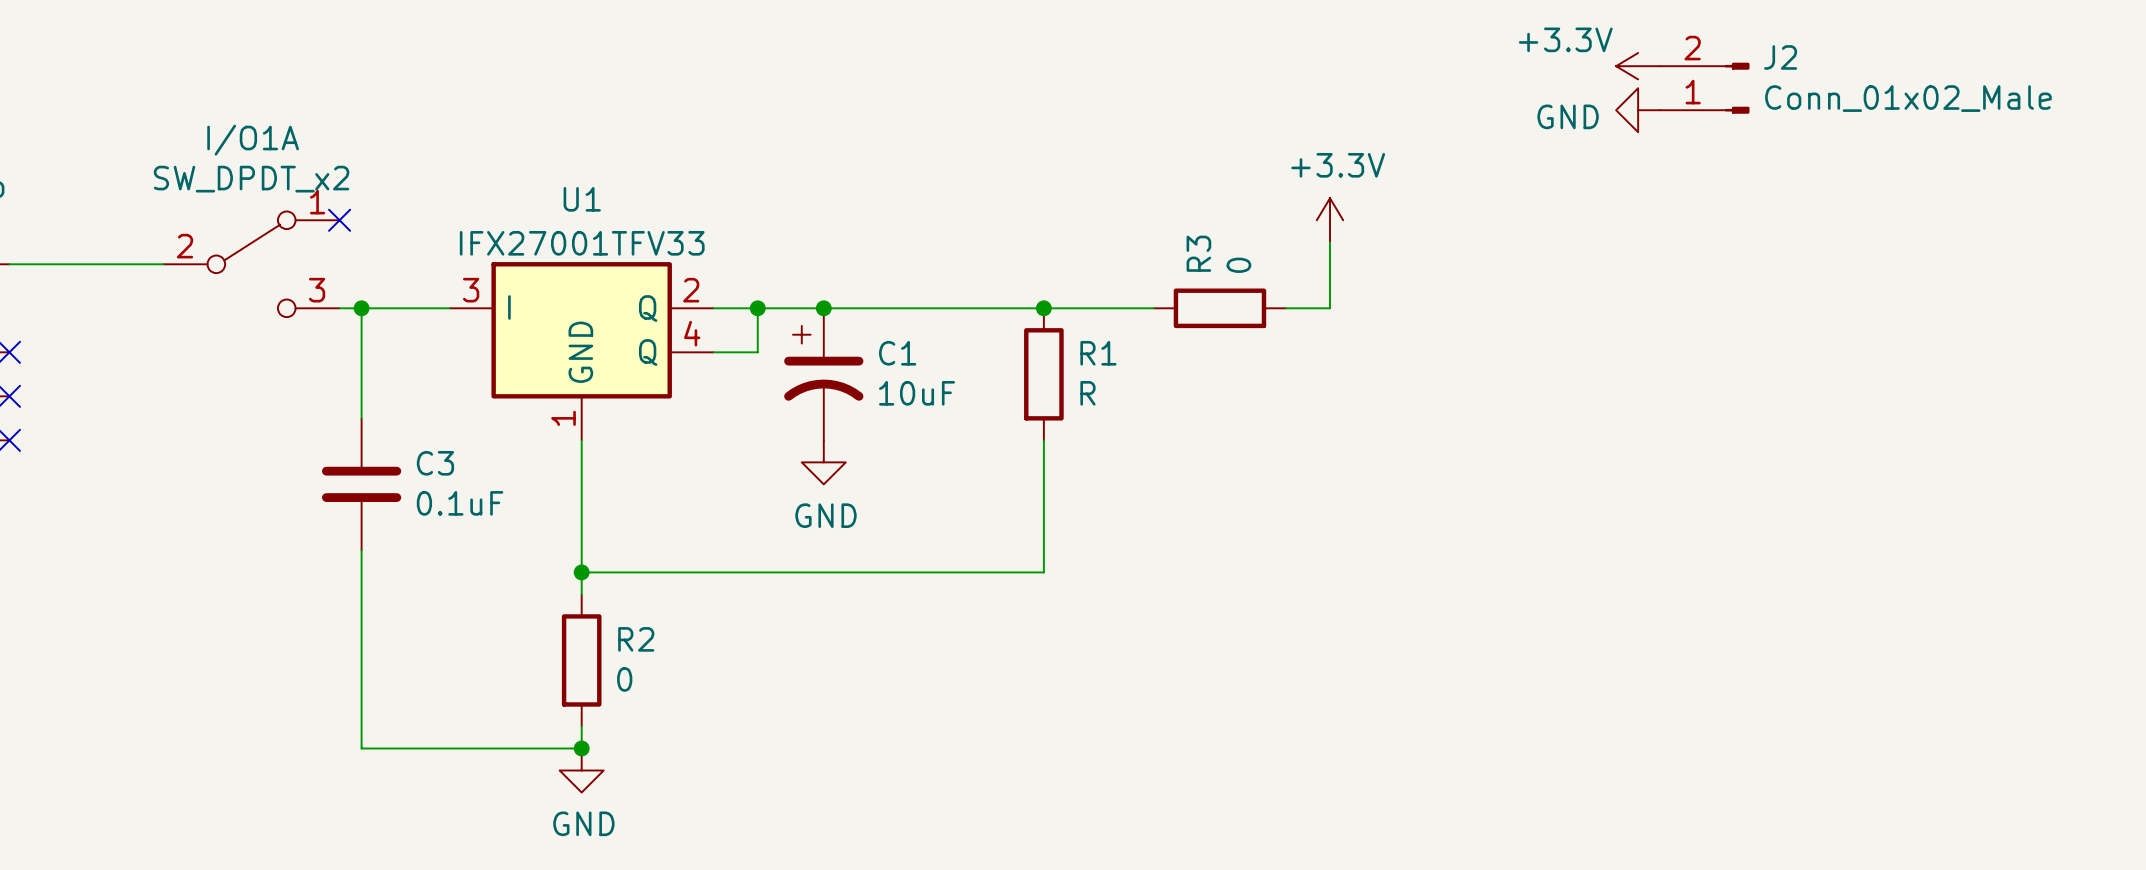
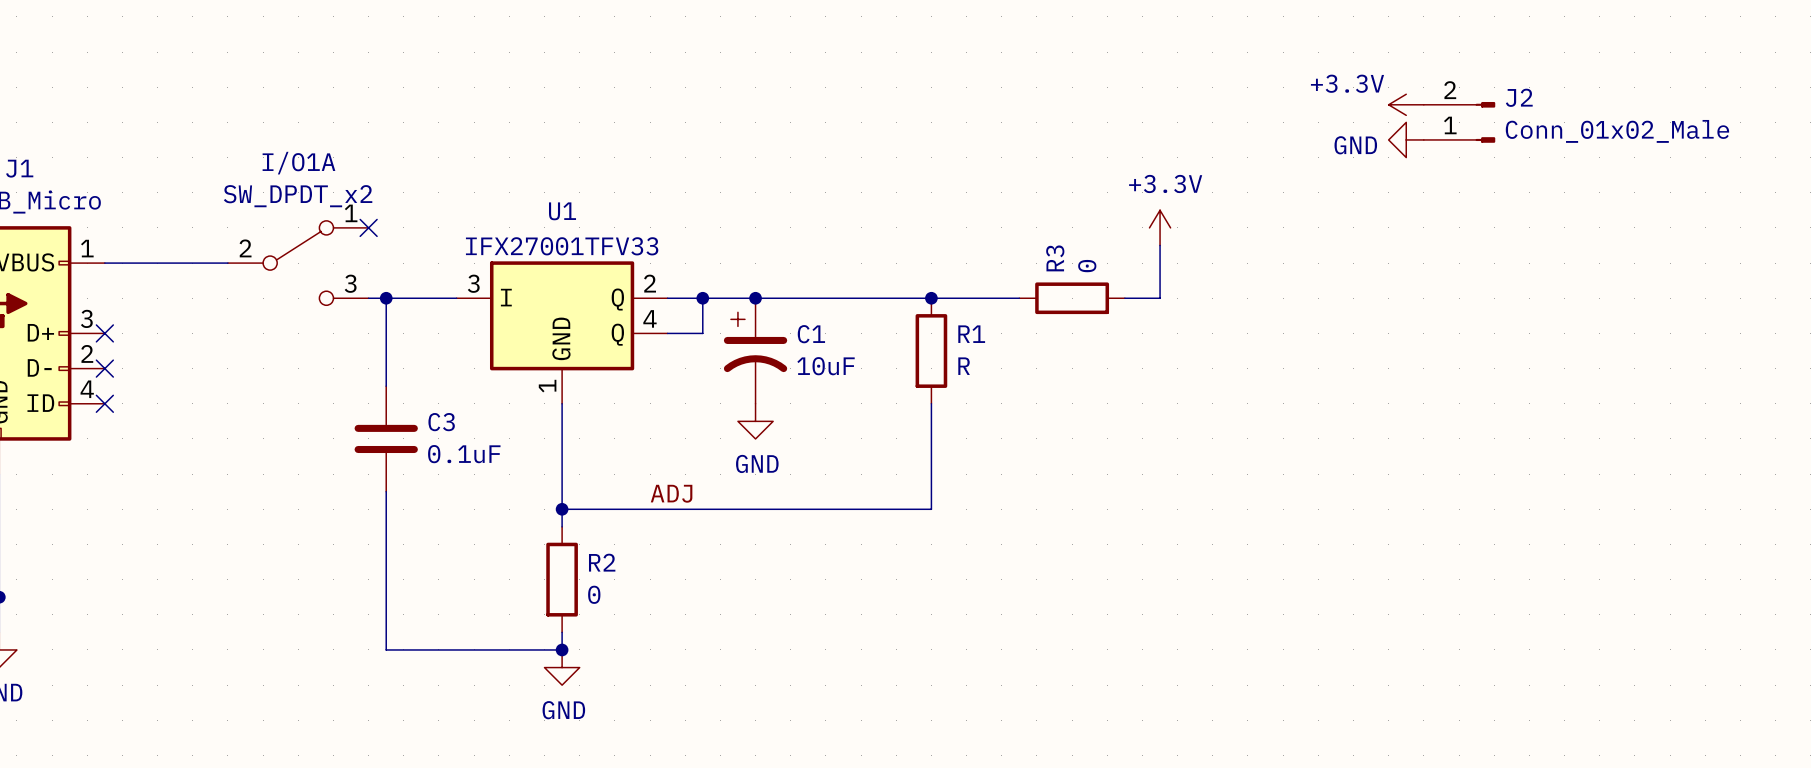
label: none -> ADJ (671, 493)

